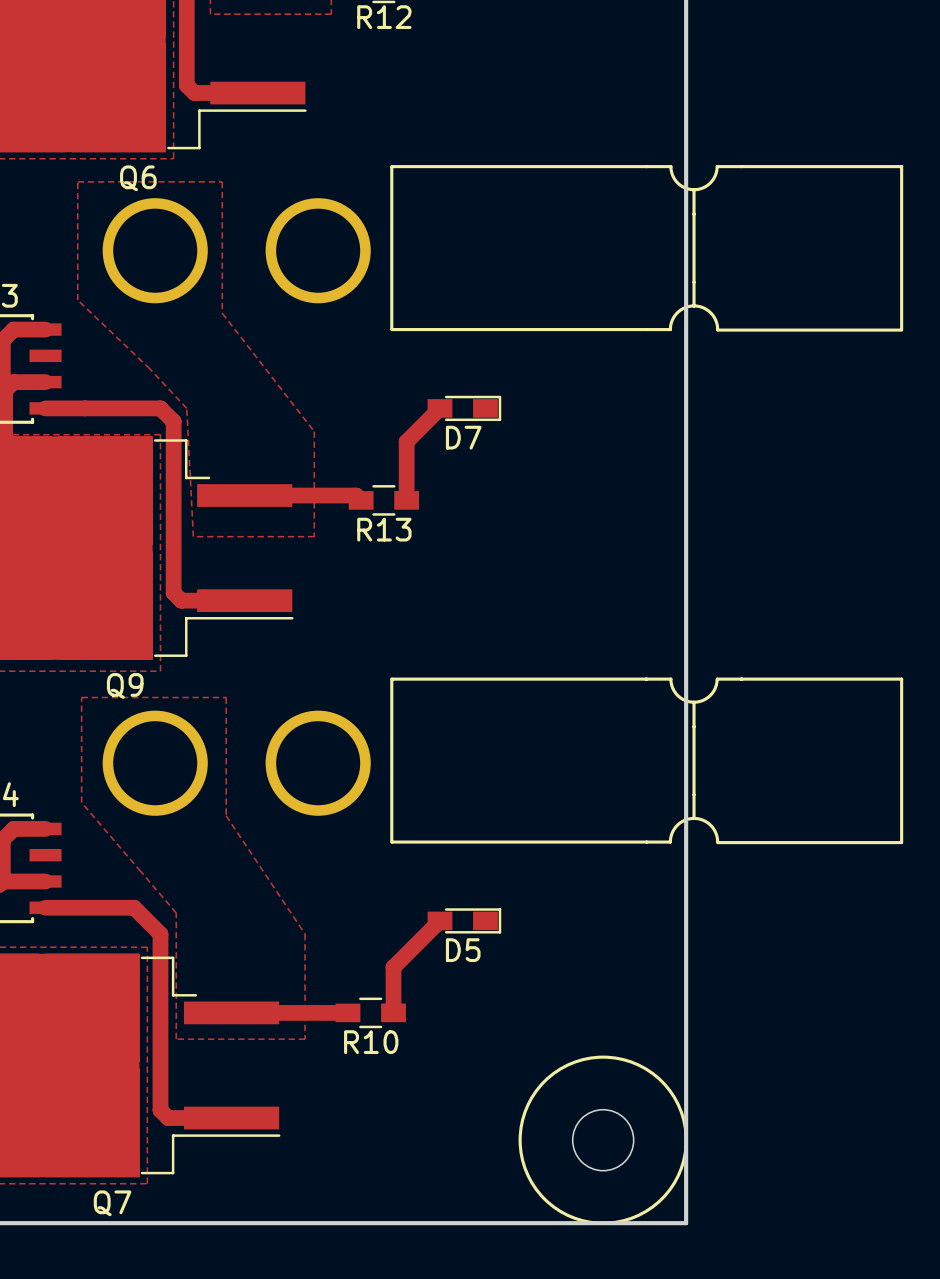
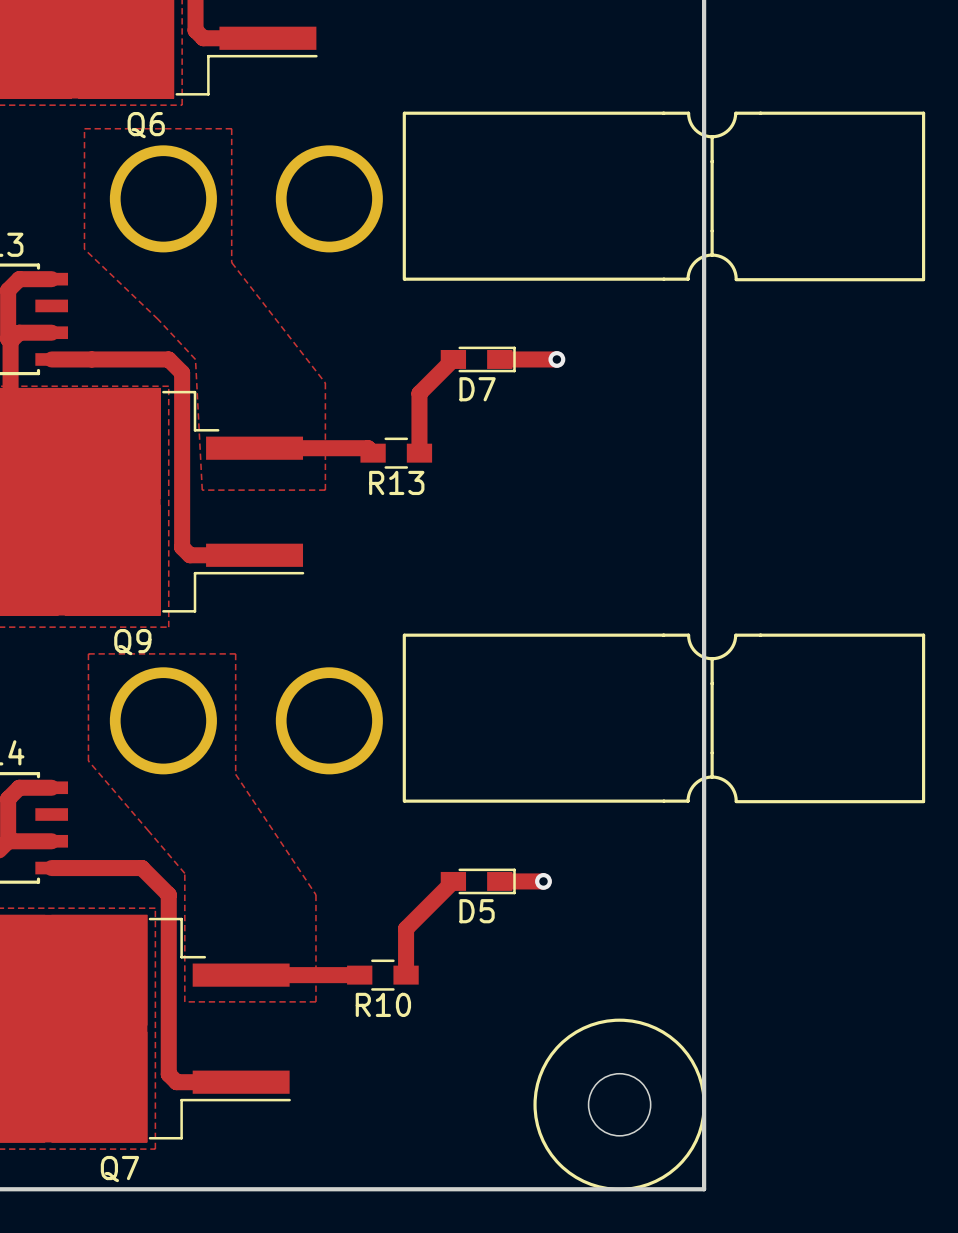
top track: none -> (499, 359) (556, 359)
via: none -> (556, 359)
top track: none -> (499, 881) (543, 881)
via: none -> (543, 881)

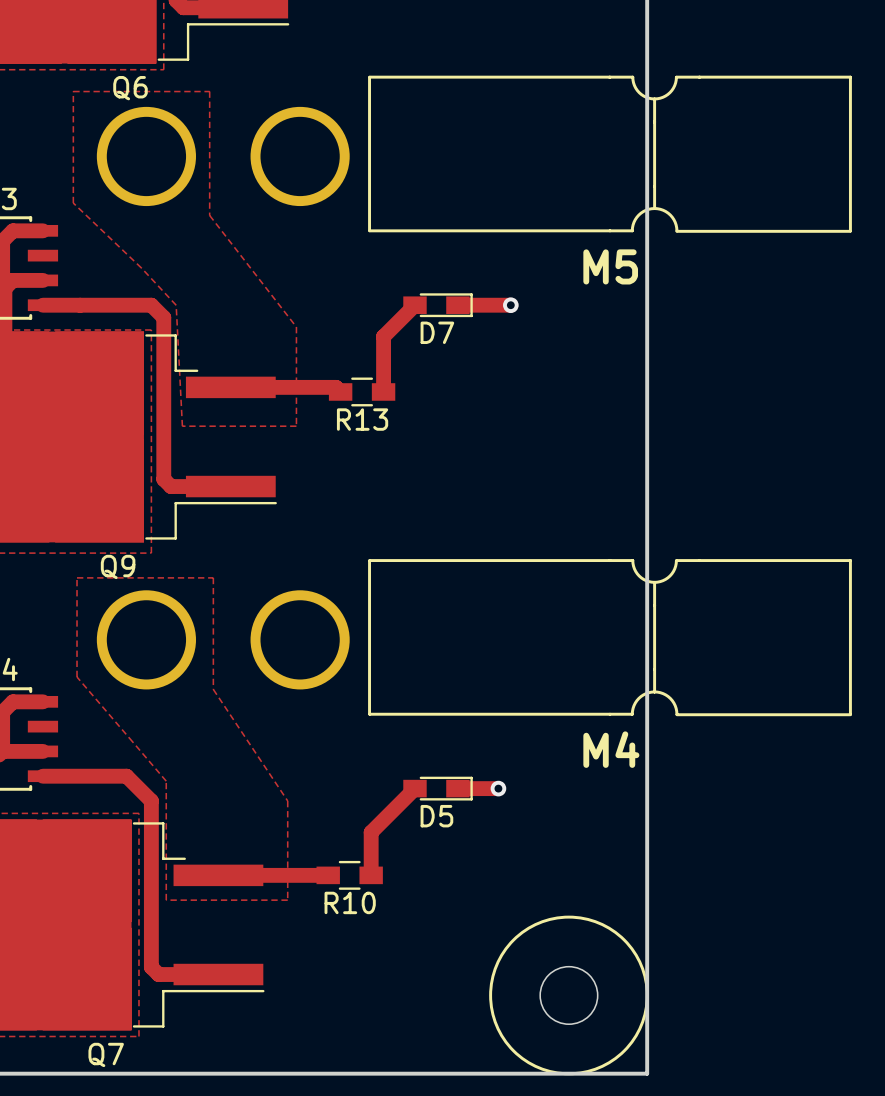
text: none -> M5 (610, 266)
text: none -> M4 (611, 749)

